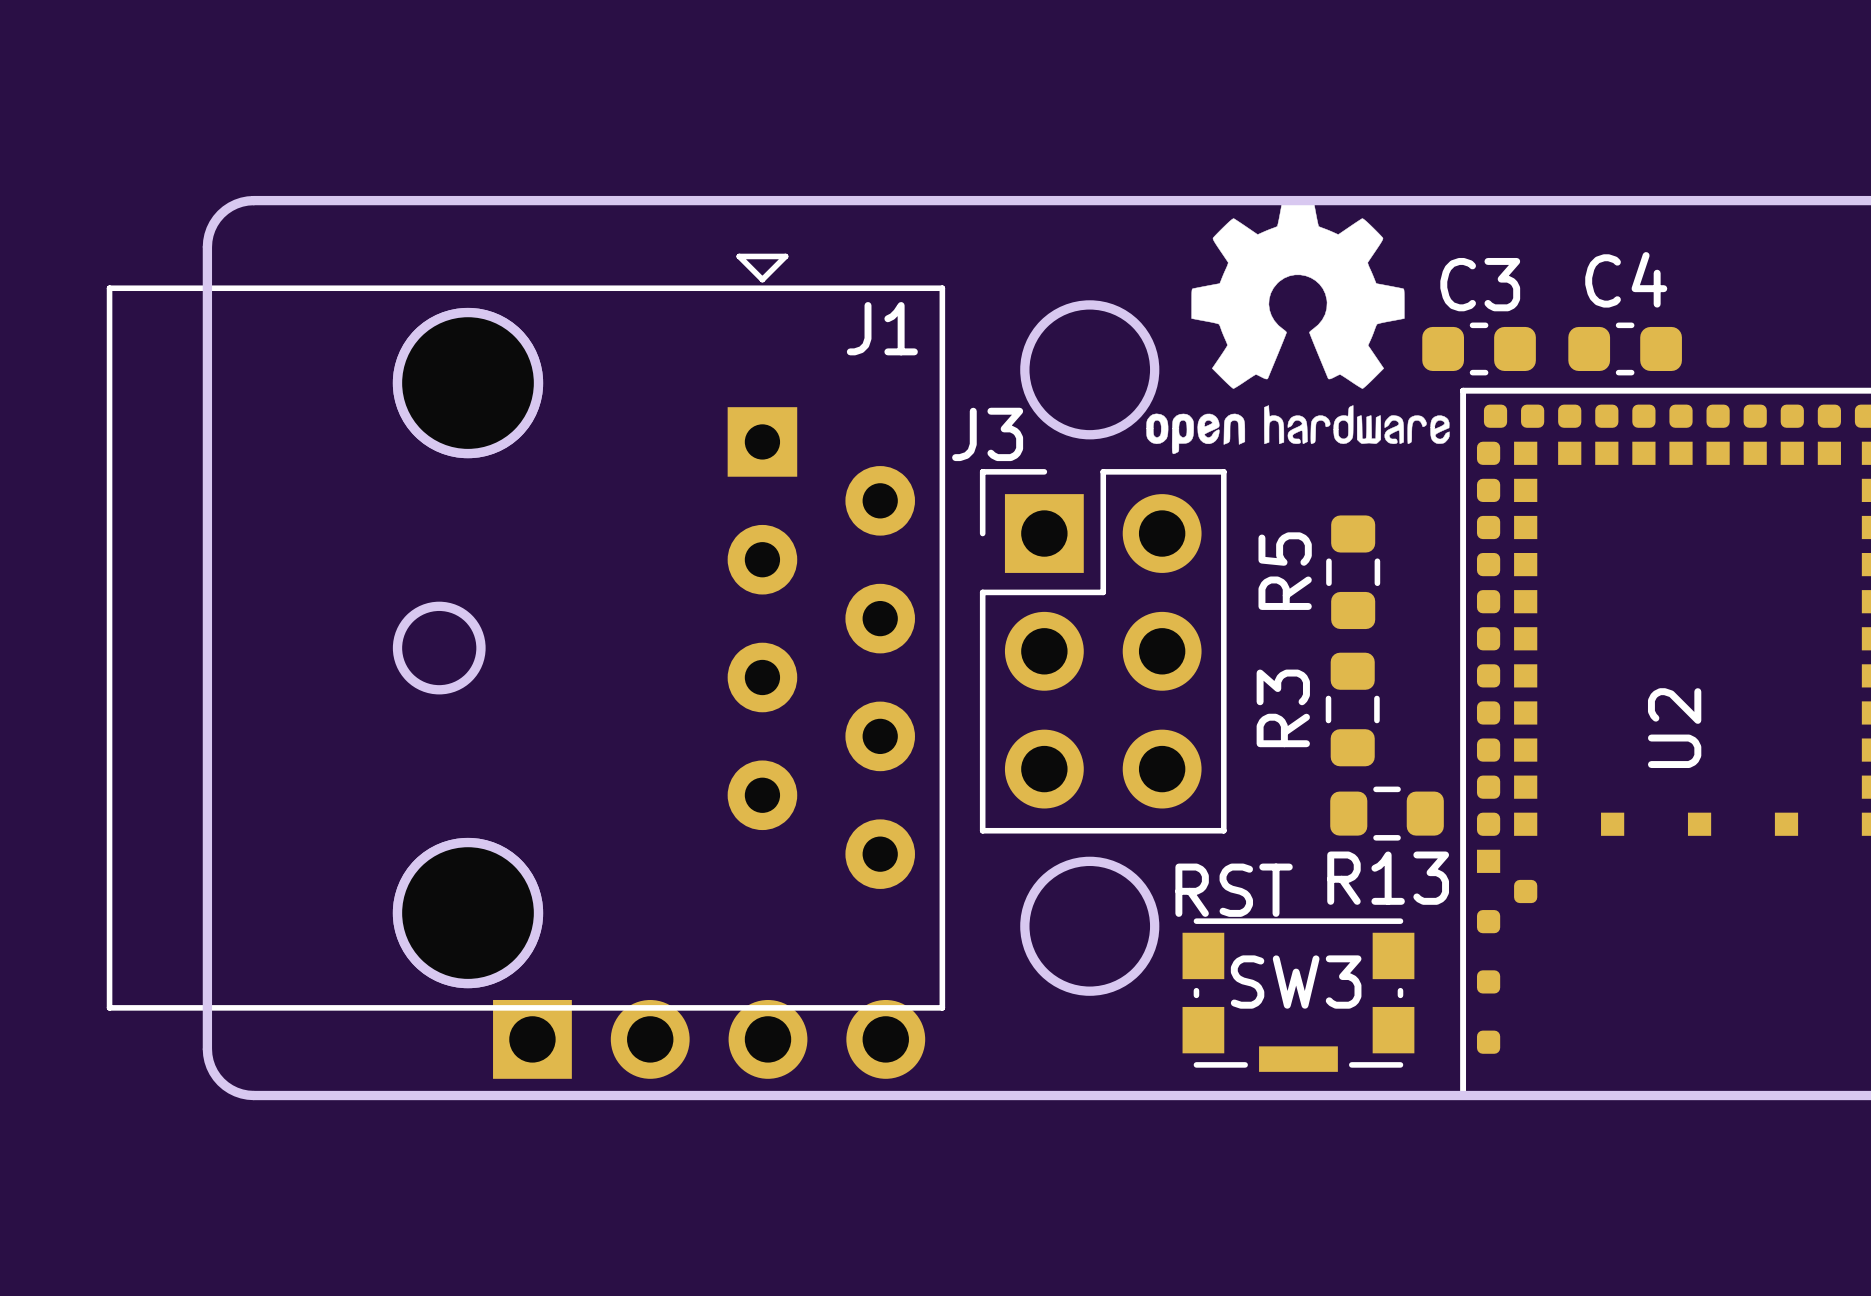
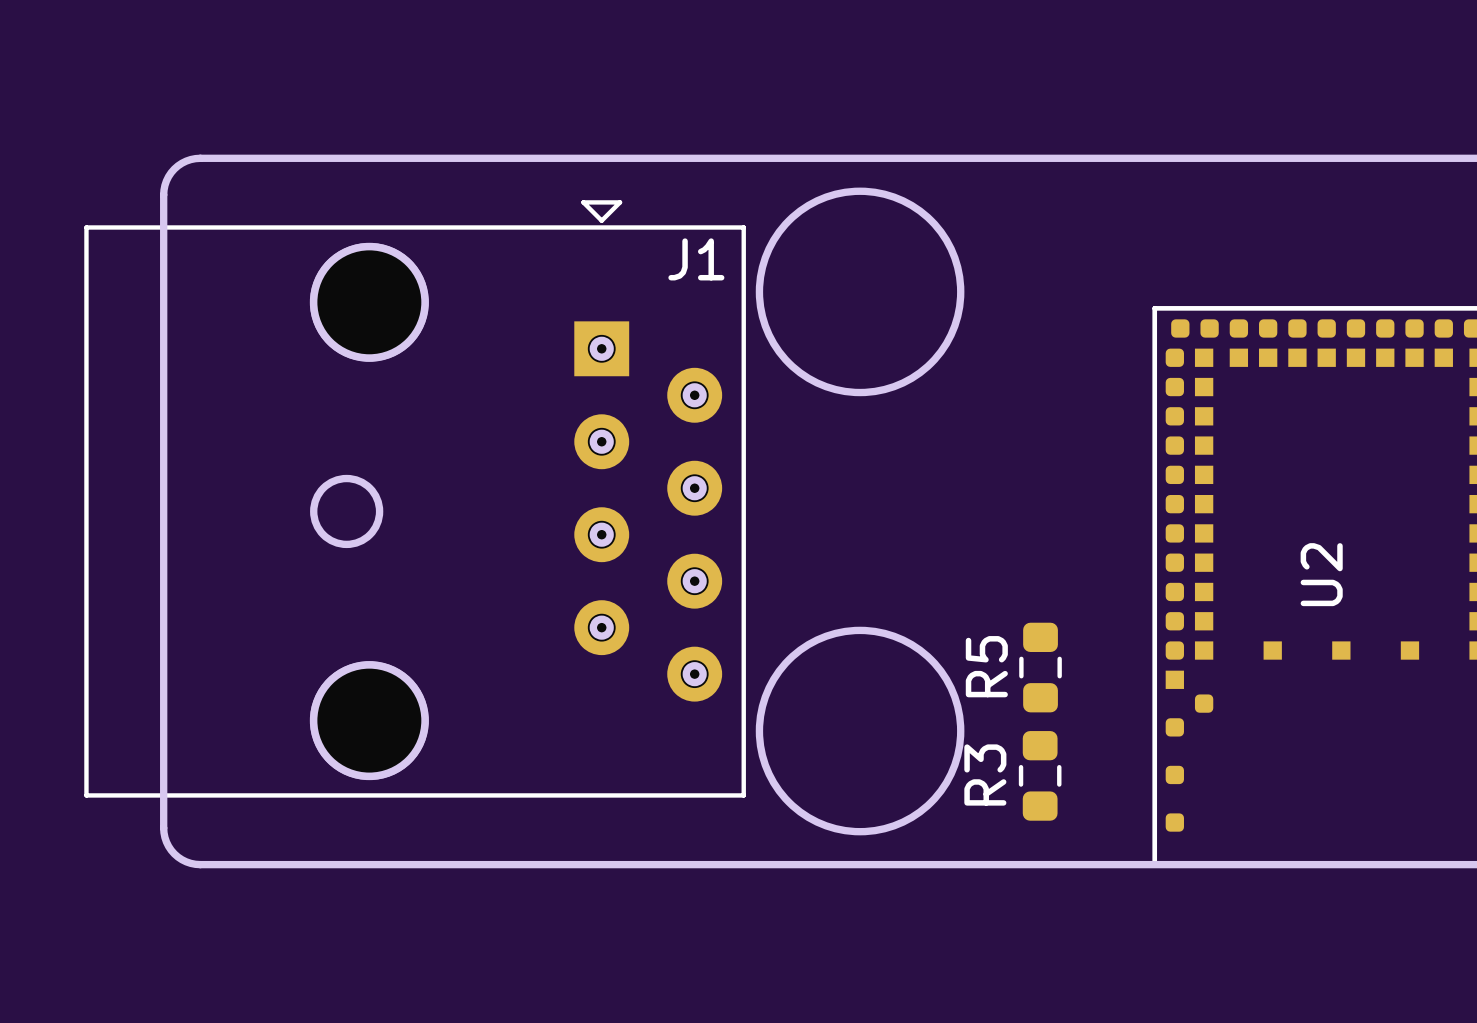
drawing: [1146, 197, 1450, 455] -> none
round board edge size: [1020, 300, 1160, 440] -> [755, 187, 965, 397]
C3: (1479, 348) -> none
C4: (1625, 348) -> none
round board edge: none -> [589, 336, 614, 361]
round board edge: none -> [682, 383, 707, 408]
round board edge: none -> [589, 429, 614, 454]
R5 position: (1353, 572) -> (1040, 667)
round board edge: none -> [682, 476, 707, 501]
J3: (1103, 651) -> none
round board edge: none -> [589, 522, 614, 547]
R3 position: (1352, 709) -> (1040, 775)
round board edge: none -> [682, 569, 707, 594]
round board edge: none -> [589, 615, 614, 640]
R13: (1387, 813) -> none
round board edge: none -> [682, 662, 707, 687]
round board edge size: [1020, 856, 1160, 996] -> [755, 626, 965, 836]
SW3: RST (1298, 995) -> none
part: (709, 1039) -> none

